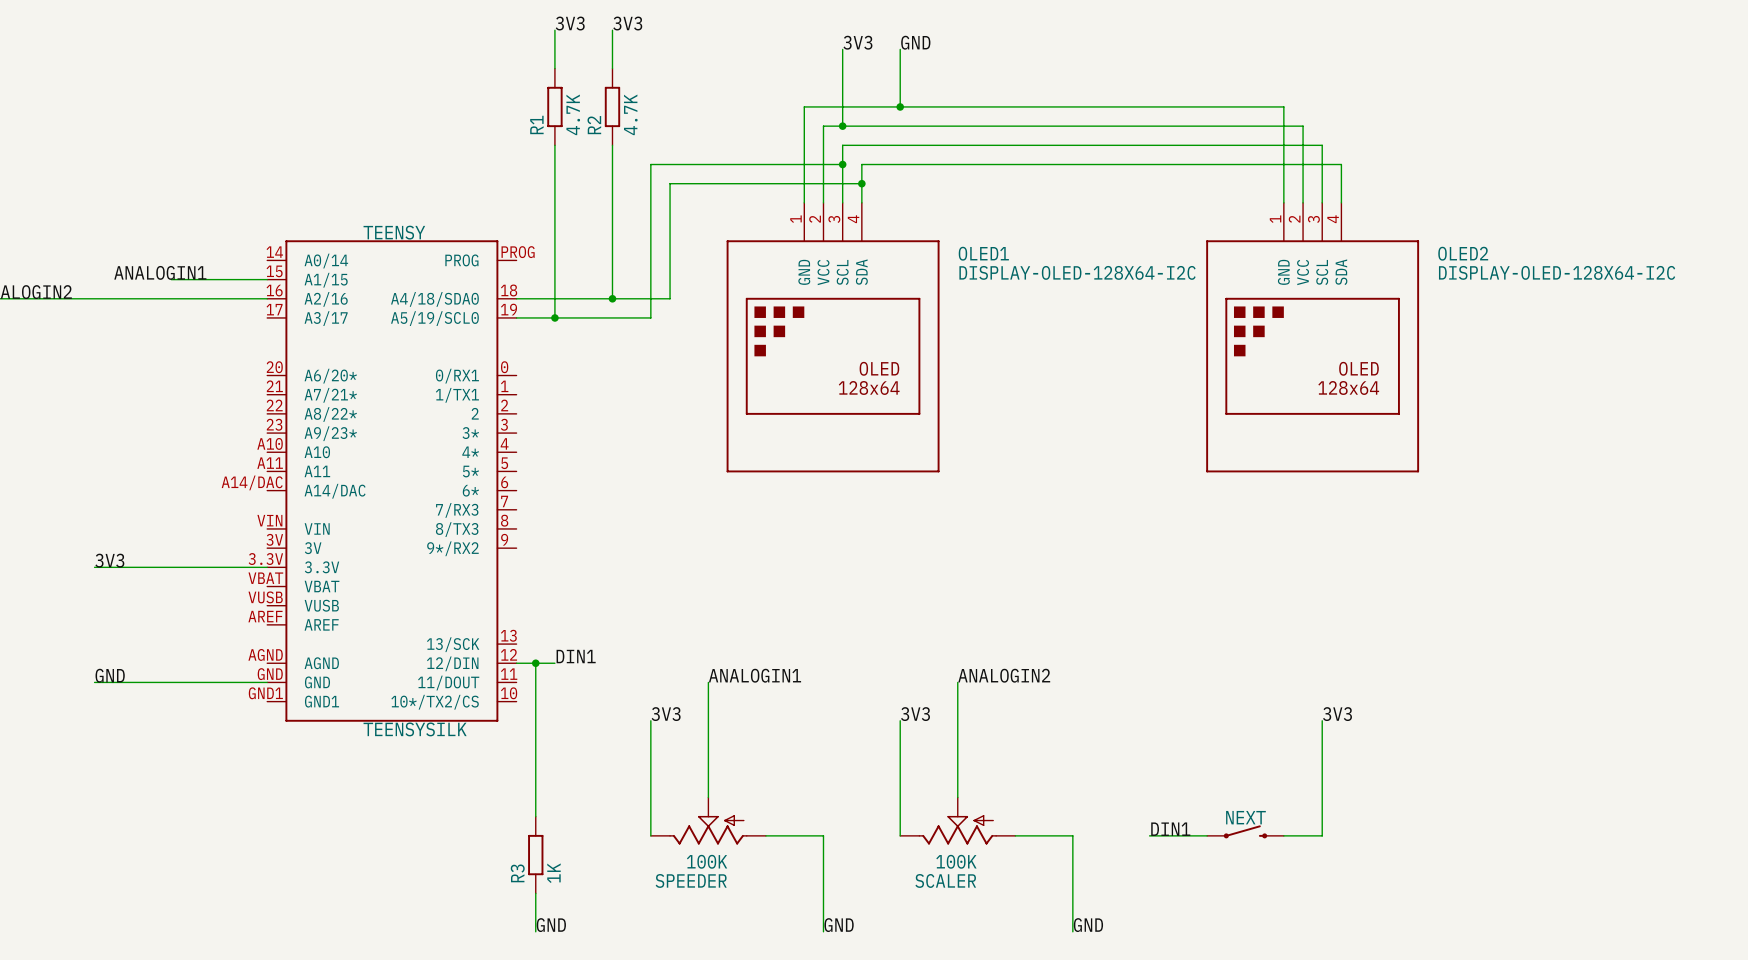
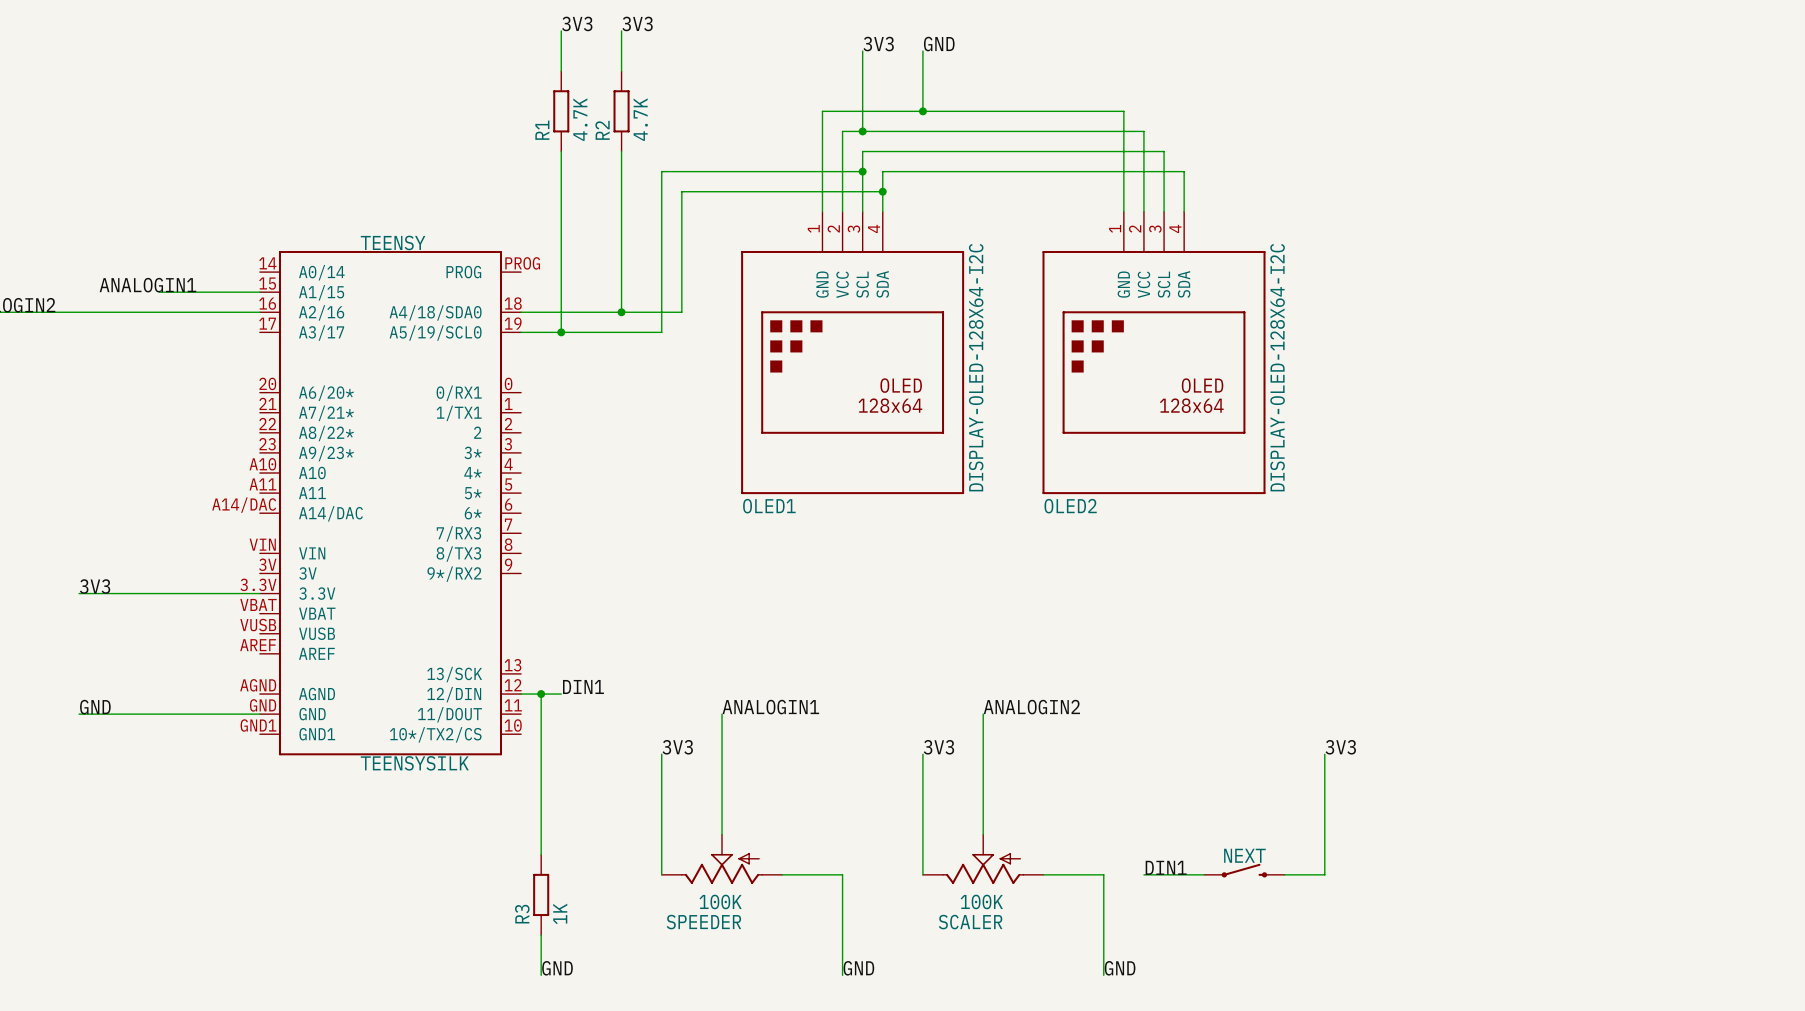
wire: (1092, 106) (1283, 106) (1283, 202) -> (1123, 111) (1123, 211)
wire: (1111, 126) (1303, 126) (1303, 202) -> (1143, 131) (1143, 211)
wire: (1130, 145) (1322, 145) (1322, 202) -> (1164, 151) (1164, 211)
wire: (1149, 164) (1341, 164) (1341, 202) -> (1184, 171) (1184, 211)
OLED1 name position: OLED1 (983, 253) -> OLED1 (769, 506)
OLED2 name position: OLED2 (1463, 253) -> OLED2 (1070, 506)
OLED1 value rotation: 0° (1077, 272) -> 90° counterclockwise (976, 367)
OLED2 value rotation: 0° (1557, 272) -> 90° counterclockwise (1277, 367)
OLED2 position: (1312, 337) -> (1154, 352)
label position: 3V3 (1337, 714) -> 3V3 (1340, 747)
wire: (1322, 720) (1322, 835) (1283, 835) -> (1324, 754) (1324, 874) (1284, 874)
label position: DIN1 (1170, 829) -> DIN1 (1166, 867)
NEXT position: (1245, 831) -> (1244, 870)

